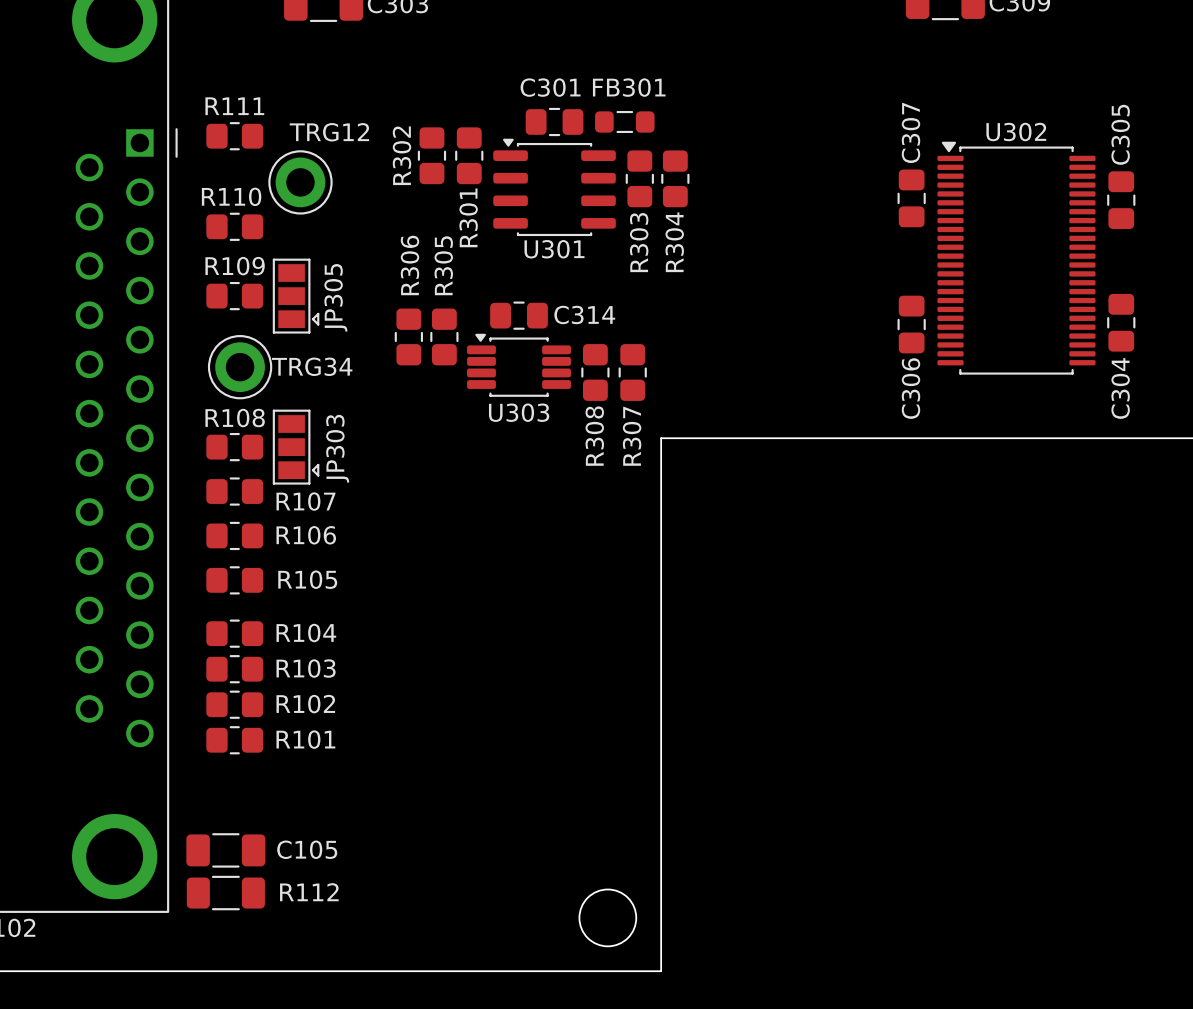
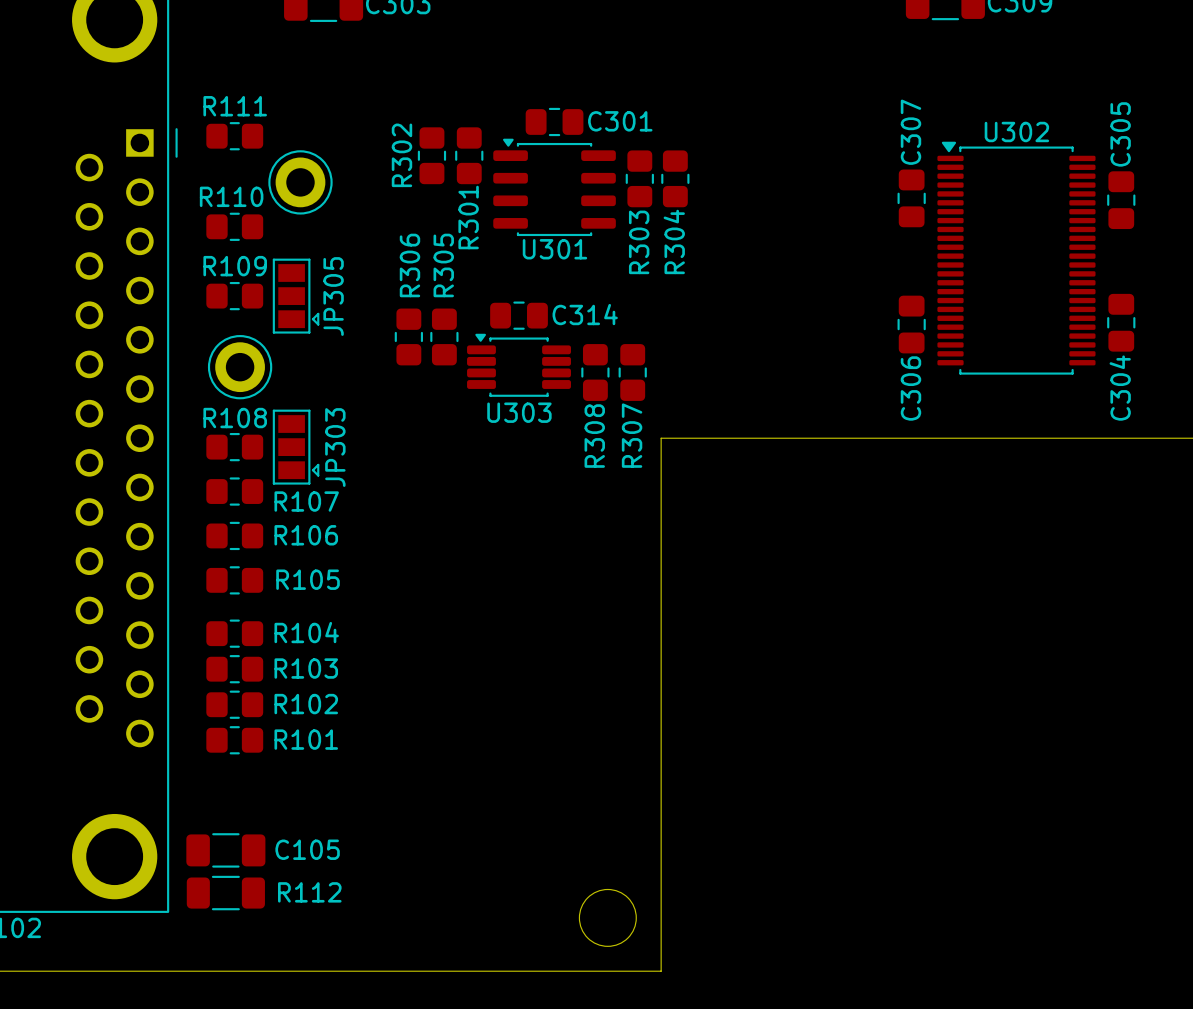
C301 name position: C301 (550, 87) -> C301 (620, 121)
FB301: (624, 121) -> none
text: TRG12 (329, 132) -> none
text: TRG34 (312, 366) -> none

